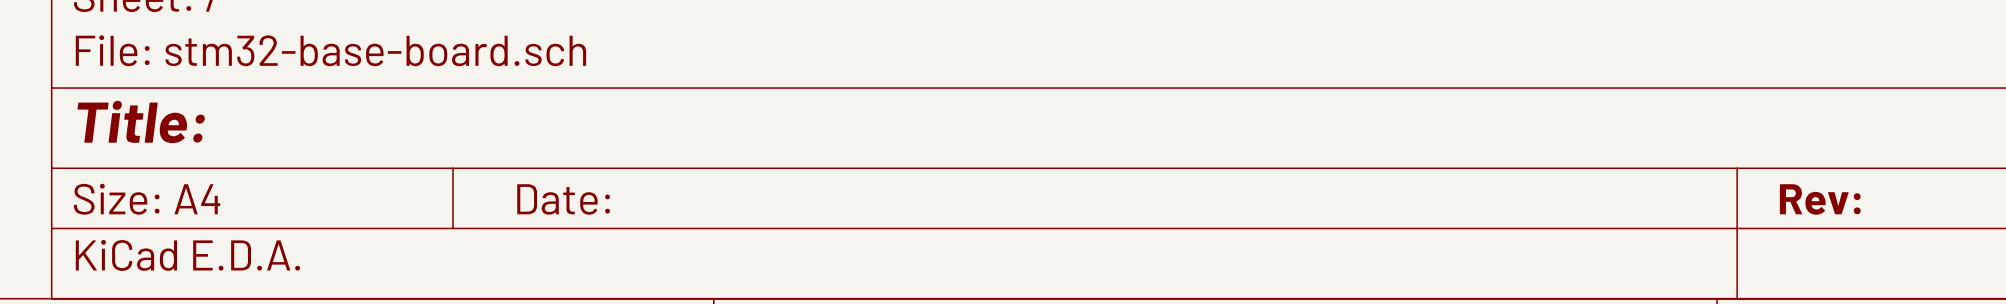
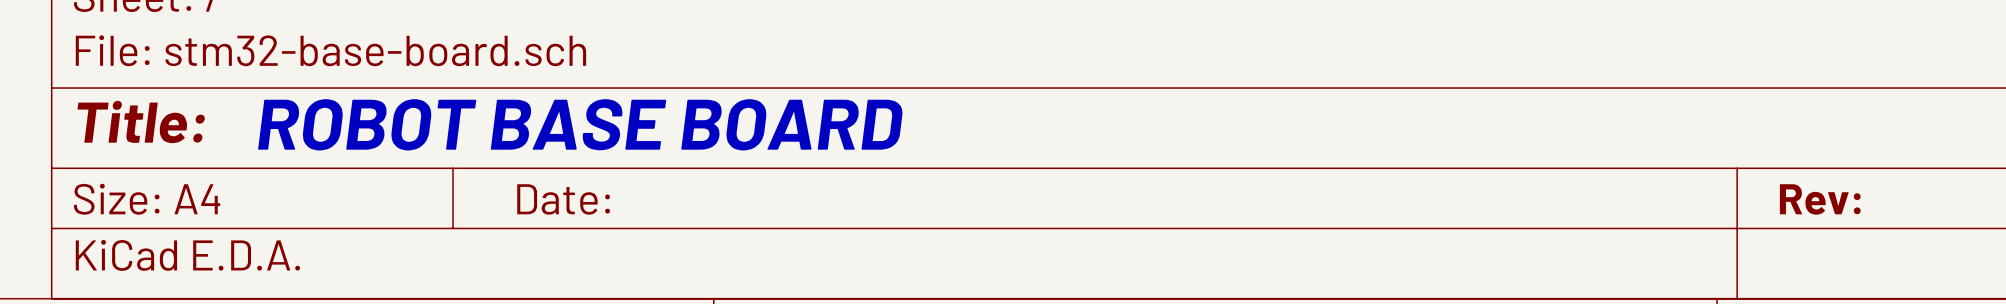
text: none -> ROBOT BASE BOARD (580, 124)

